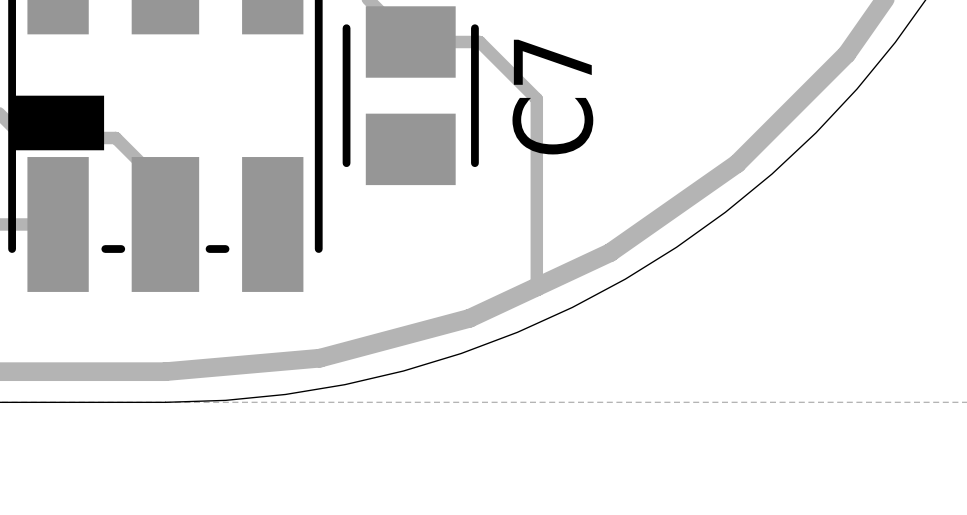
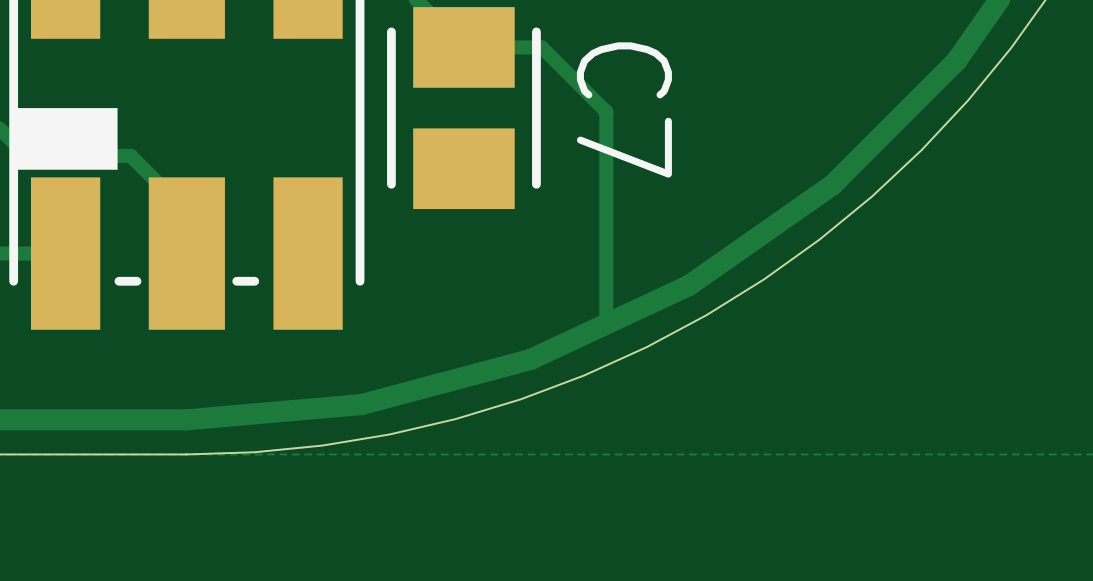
C7 name rotation: 0° (552, 97) -> 180° (624, 109)

